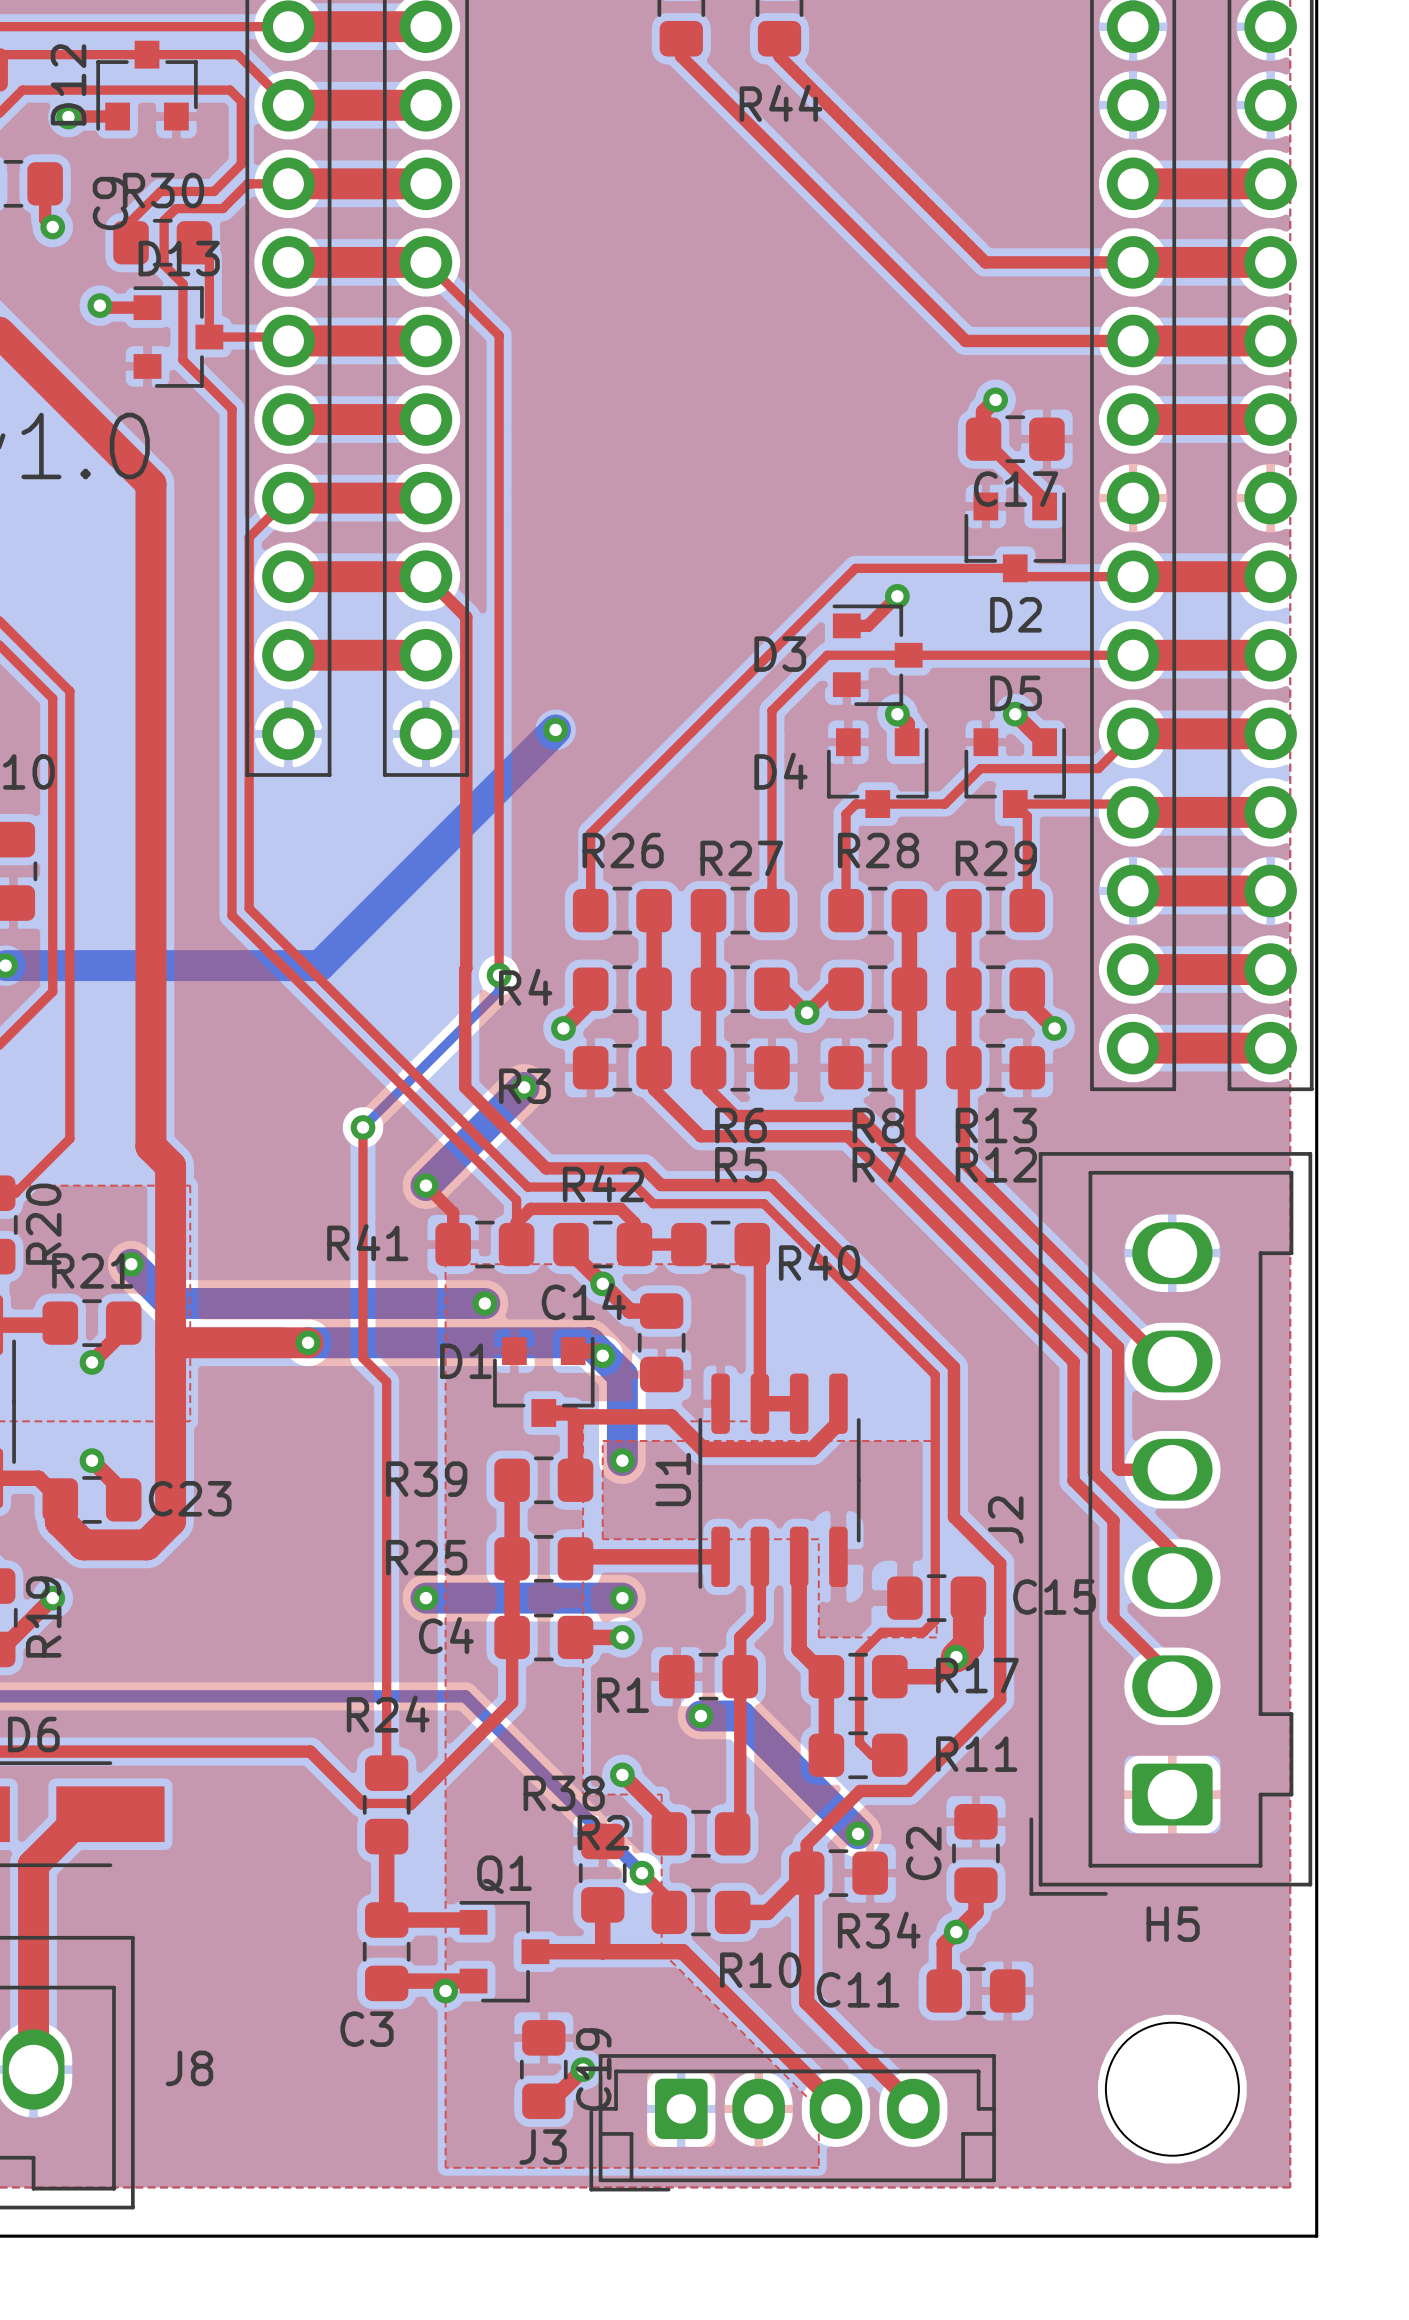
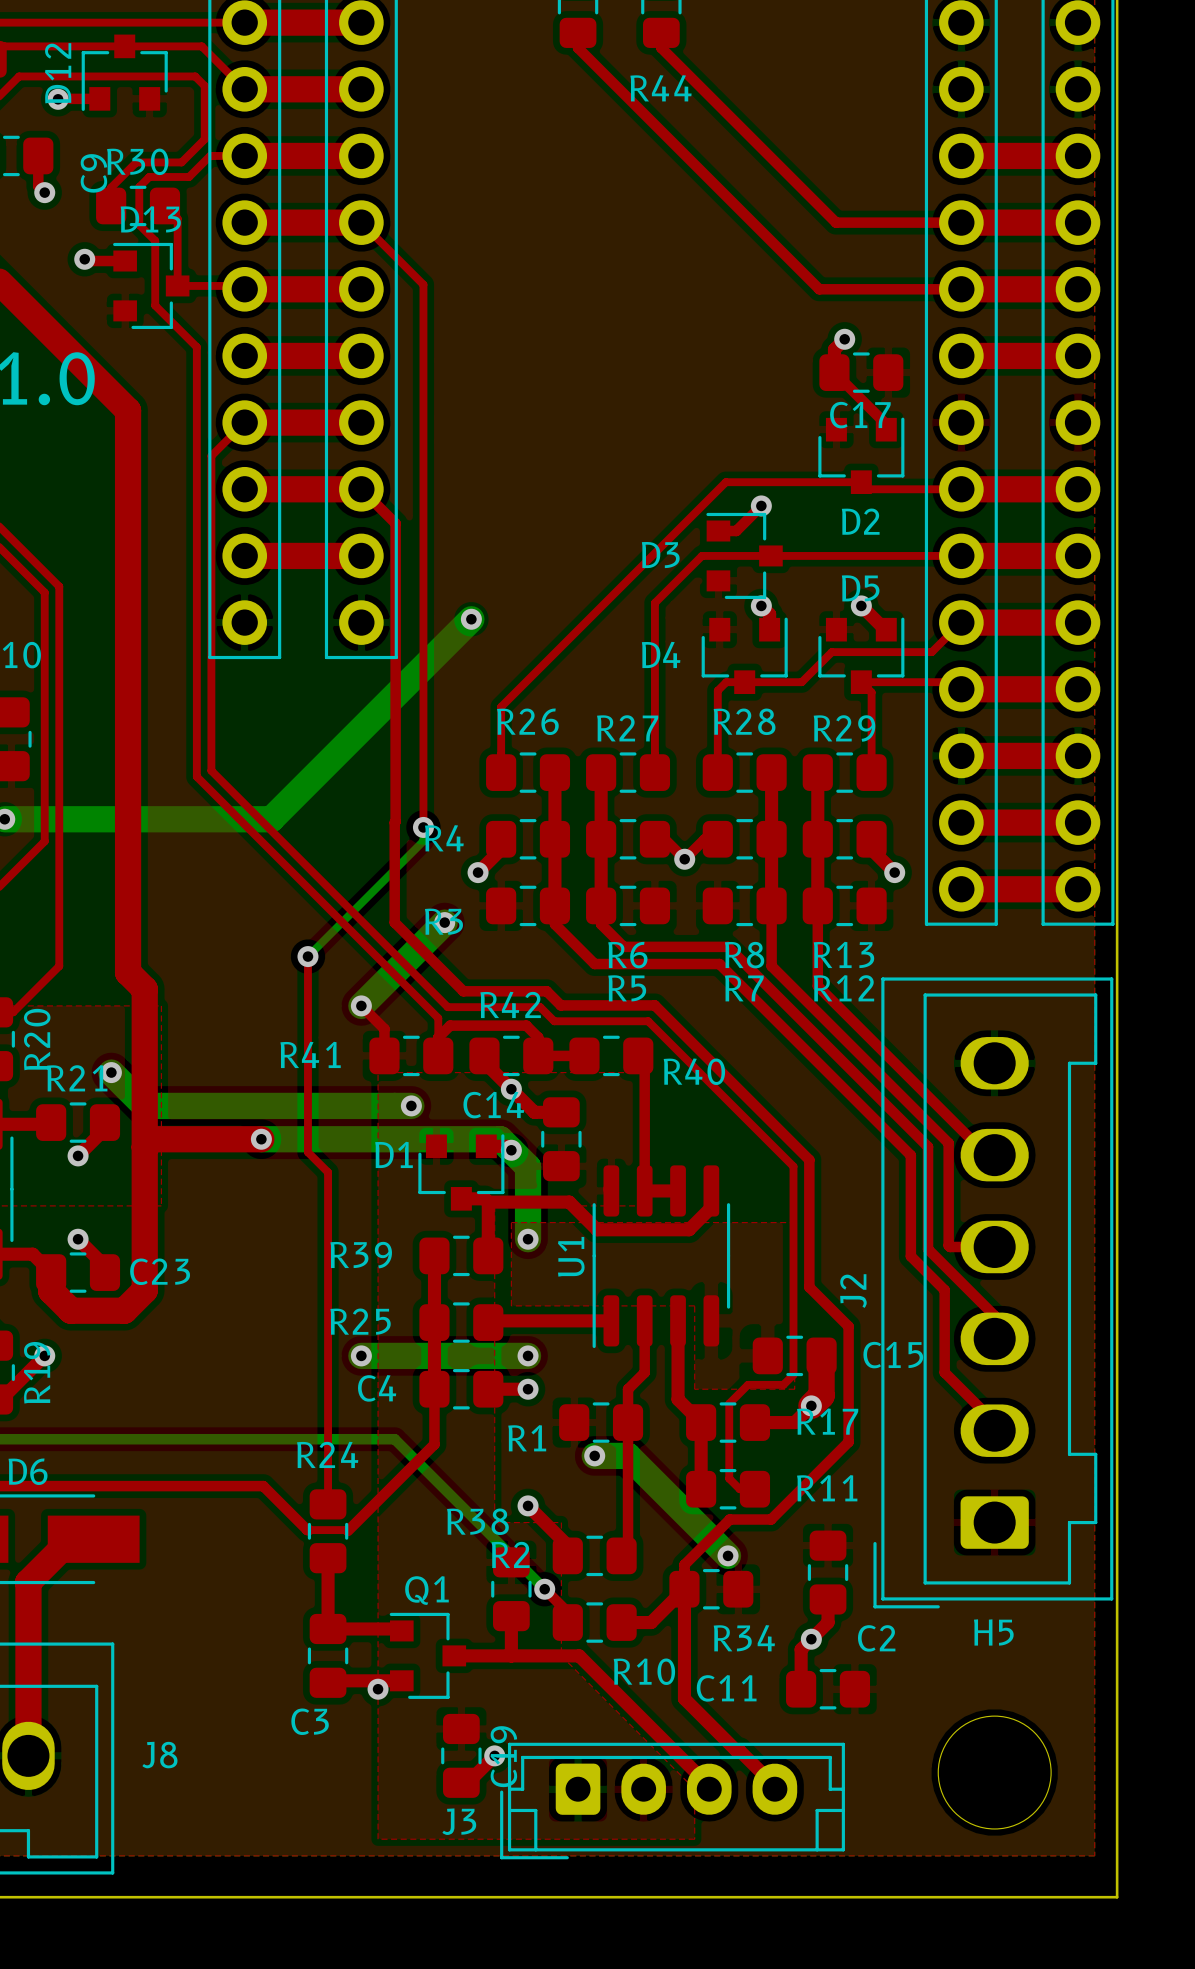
C2 name rotation: 0° (923, 1853) -> 90° clockwise (876, 1638)
C2 name position: C2 (923, 1853) -> C2 (876, 1638)

